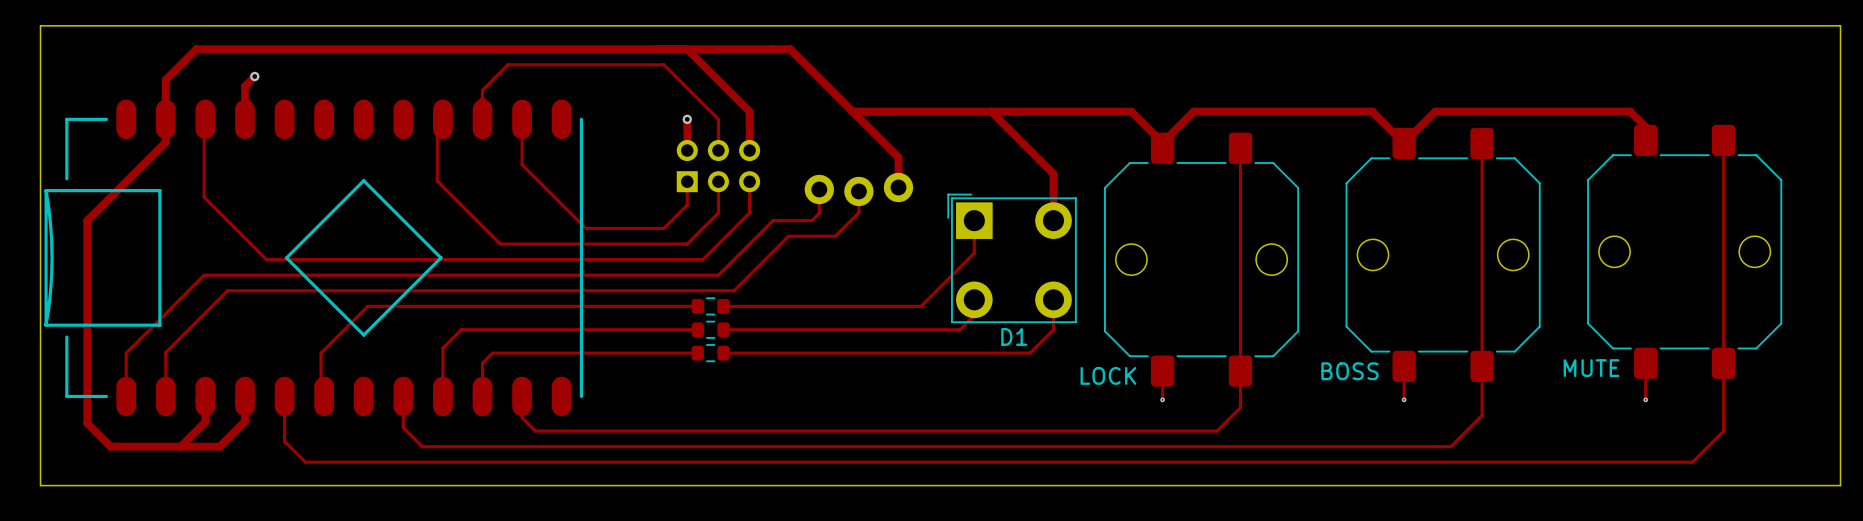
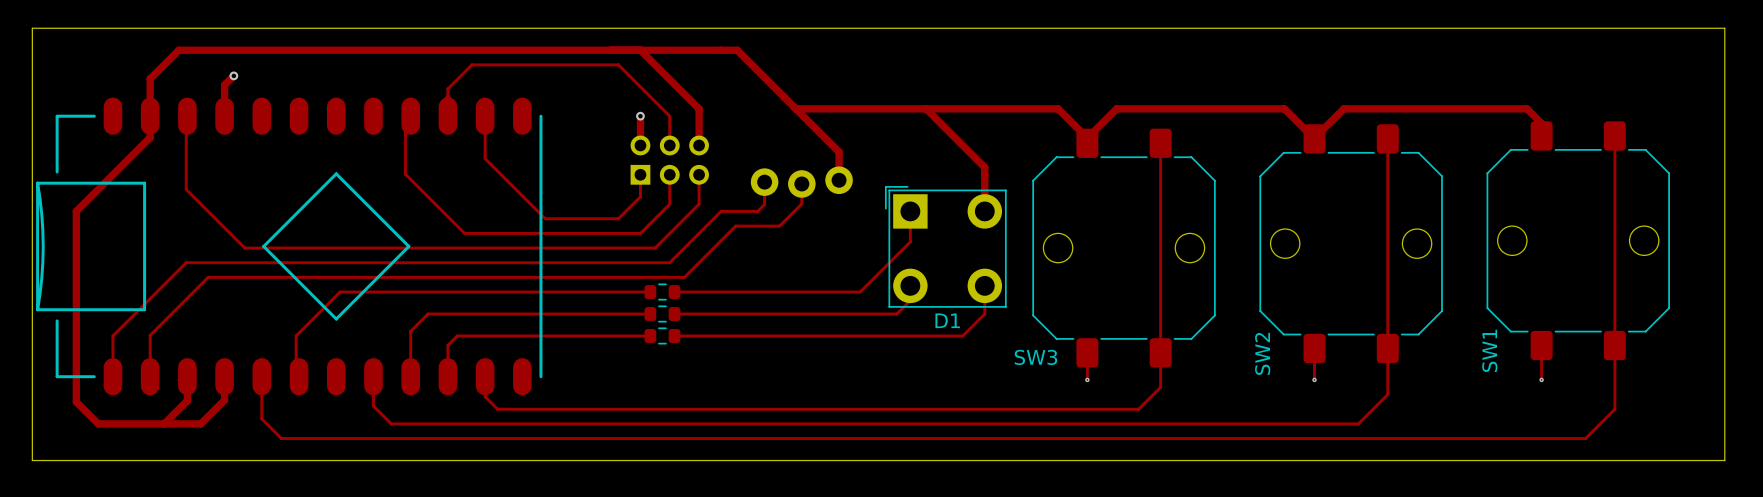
MUTE name: MUTE (1591, 368) -> SW1 (1489, 350)
BOSS name: BOSS (1349, 371) -> SW2 (1262, 353)
LOCK name: LOCK (1108, 375) -> SW3 (1035, 357)

